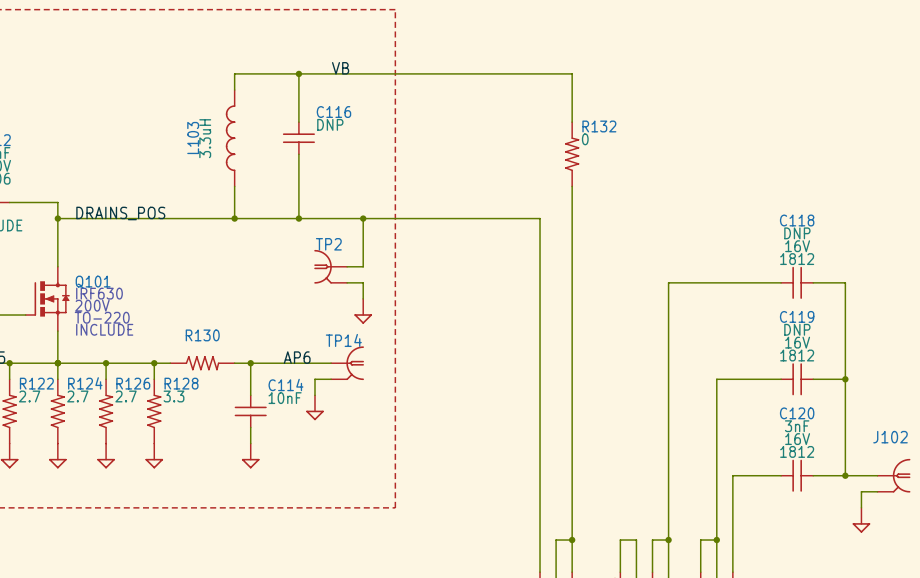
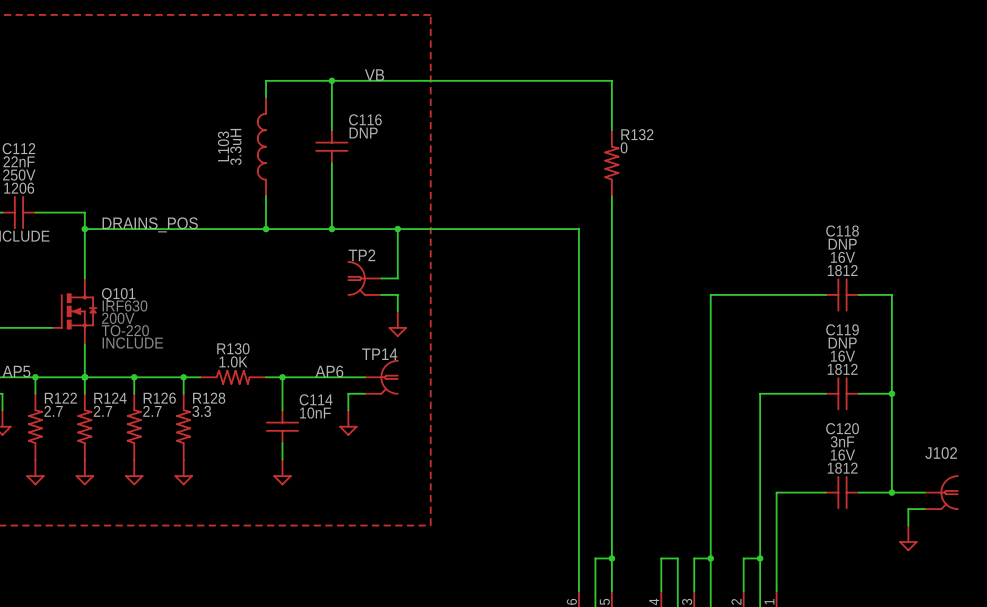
R130 value: none -> 1.0K (233, 361)

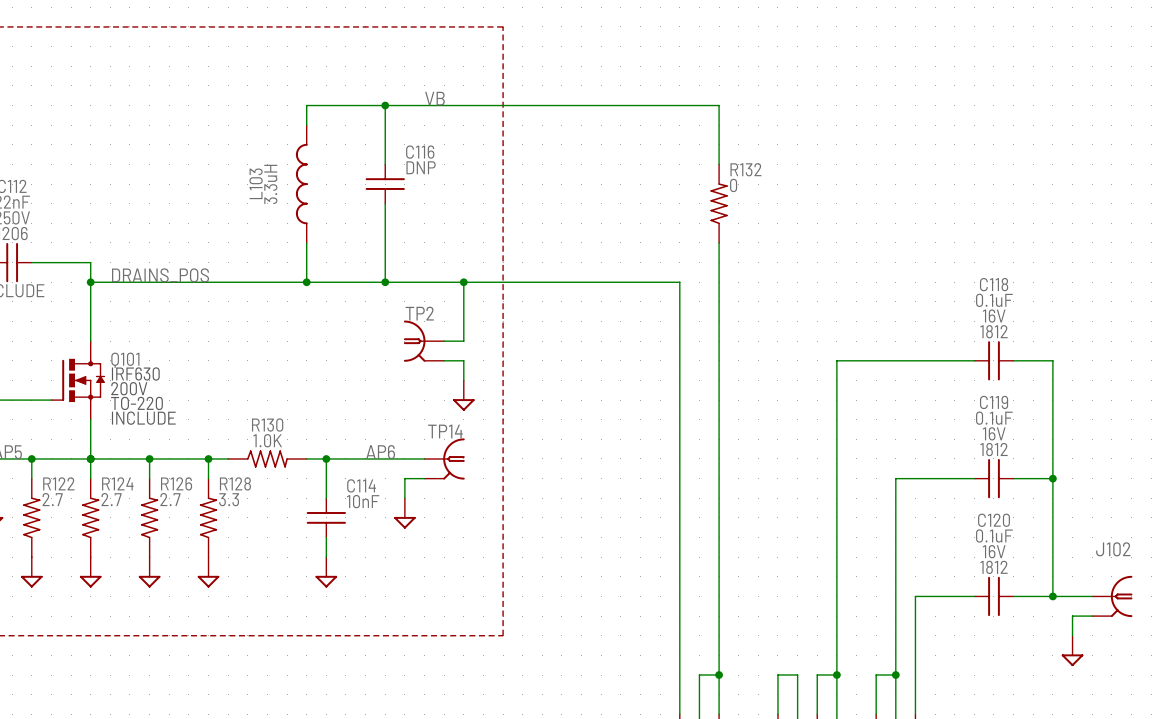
C118 value: DNP (842, 244) -> 0.1uF (994, 300)
C119 value: DNP (842, 343) -> 0.1uF (994, 418)
C120 value: 3nF (842, 441) -> 0.1uF (994, 535)

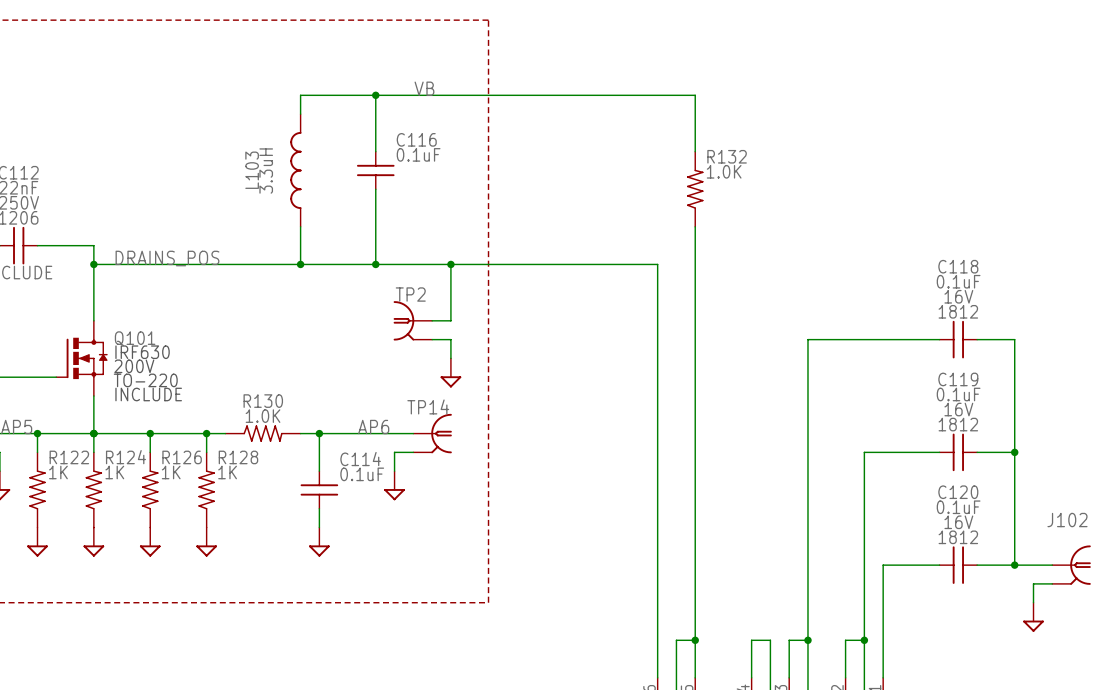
C116 value: DNP (421, 167) -> 0.1uF (418, 154)
R132 value: 0 (733, 185) -> 1.0K (724, 171)
R122 value: 2.7 (52, 499) -> 1K (58, 472)
R124 value: 2.7 (111, 499) -> 1K (114, 472)
R126 value: 2.7 (170, 499) -> 1K (171, 472)
R128 value: 3.3 (229, 499) -> 1K (227, 472)
C114 value: 10nF (363, 501) -> 0.1uF (362, 474)

